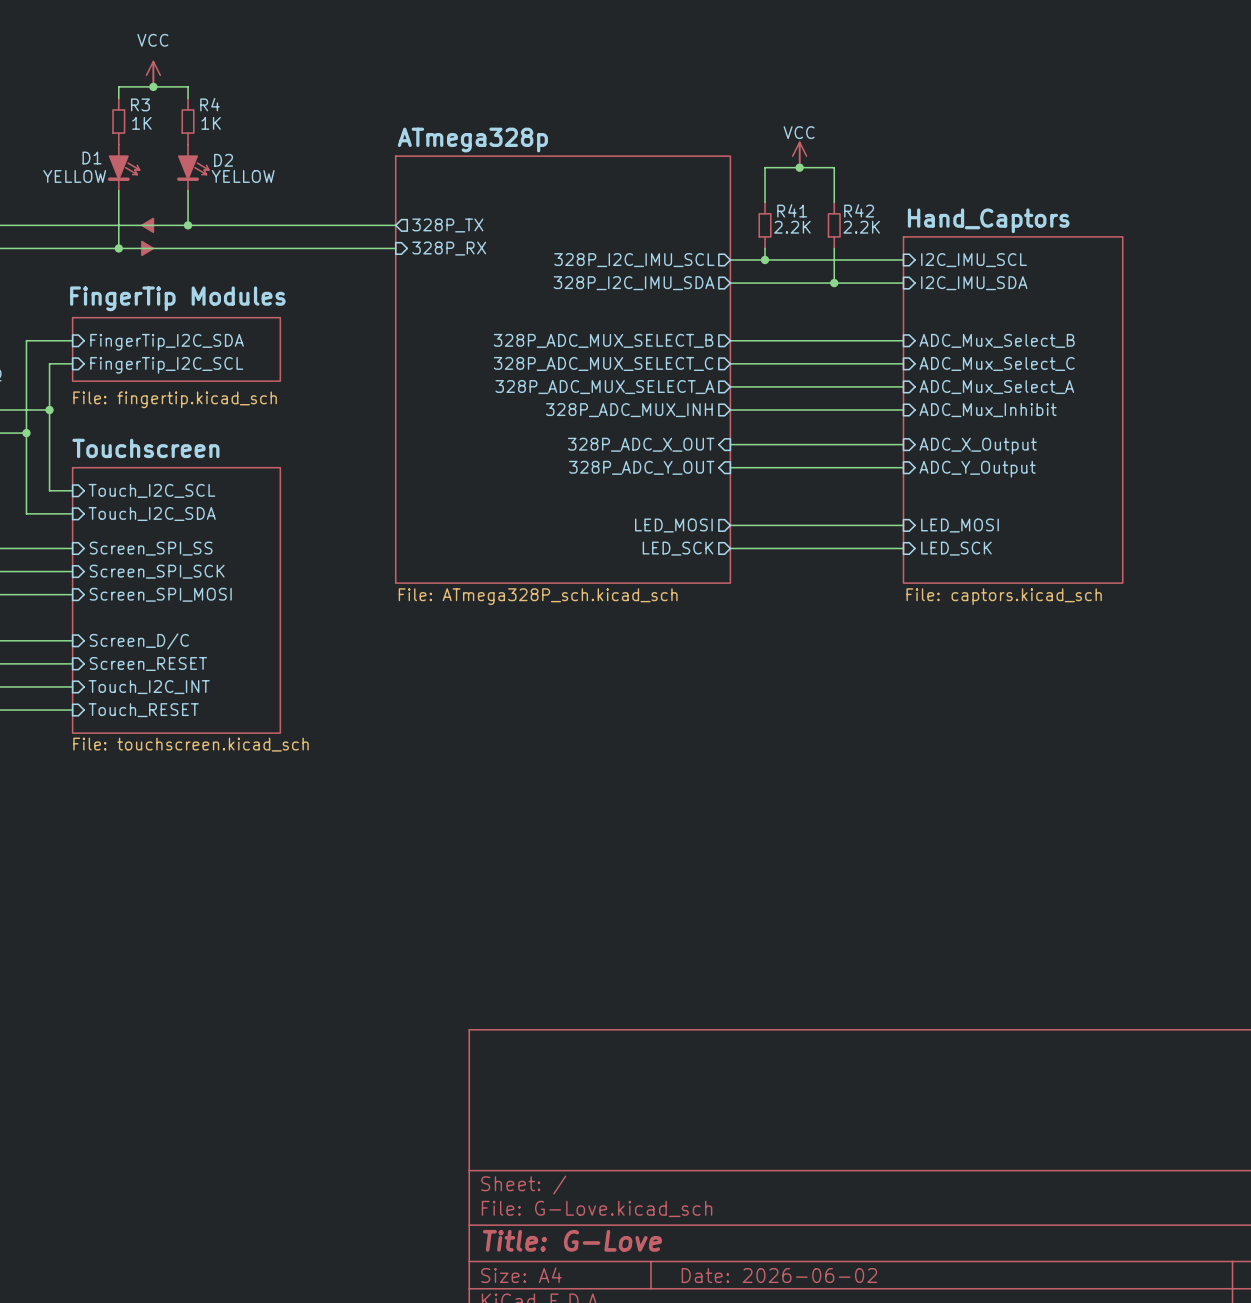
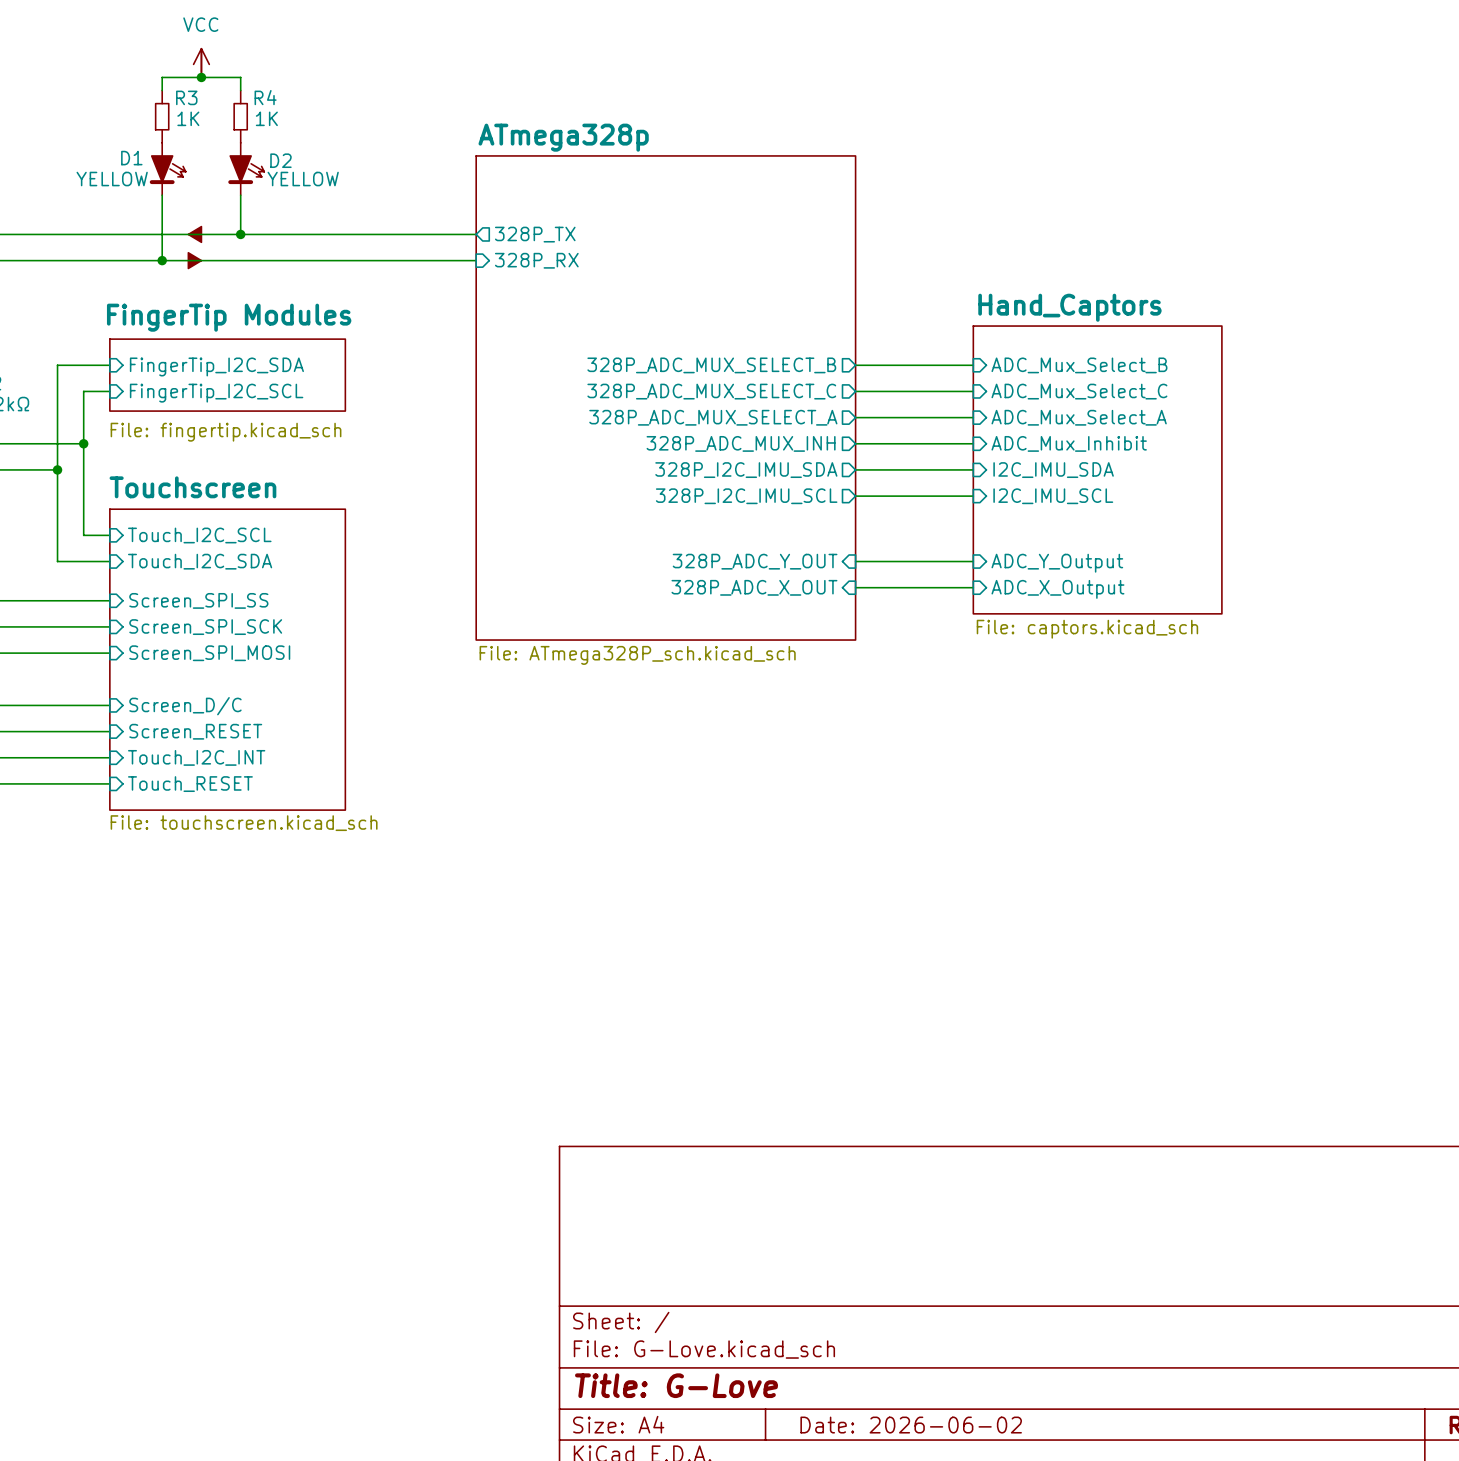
power symbol: VCC (799, 154) -> none
junction: (799, 167) -> none
wire: (765, 202) (765, 167) (834, 167) (834, 202) -> none
R41: 2.2K (765, 225) -> none
R42: 2.2K (834, 225) -> none
wire: (765, 248) (765, 259) -> none
wire: (834, 248) (834, 283) -> none
wire: (730, 259) (903, 259) -> none
junction: (765, 259) -> none
sheet pin position: 328P_I2C_IMU_SCL (634, 260) -> 328P_I2C_IMU_SCL (746, 496)
sheet pin position: I2C_IMU_SCL (974, 260) -> I2C_IMU_SCL (1053, 496)
sheet pin position: 328P_I2C_IMU_SDA (634, 283) -> 328P_I2C_IMU_SDA (746, 470)
wire: (730, 283) (903, 283) -> none
junction: (834, 283) -> none
sheet pin position: I2C_IMU_SDA (974, 283) -> I2C_IMU_SDA (1053, 470)
wire: (834, 340) (903, 340) -> none
sheet pin position: ADC_Mux_Select_B (997, 340) -> ADC_Mux_Select_B (1079, 365)
wire: (834, 363) (903, 363) -> none
sheet pin position: ADC_Mux_Select_C (997, 363) -> ADC_Mux_Select_C (1079, 391)
wire: (834, 386) (903, 386) -> none
sheet pin position: ADC_Mux_Select_A (996, 387) -> ADC_Mux_Select_A (1079, 417)
wire: (834, 410) (903, 410) -> none
sheet pin position: ADC_Mux_Inhibit (988, 410) -> ADC_Mux_Inhibit (1069, 443)
sheet Hand_Captors: File: captors.kicad_sch (1013, 410) -> none
wire: none -> (855, 469) (973, 469)
sheet Hand_Captors: none -> File: captors.kicad_sch (1097, 469)
sheet pin position: 328P_ADC_X_OUT (641, 444) -> 328P_ADC_X_OUT (754, 587)
wire: (730, 444) (903, 444) -> none
sheet pin position: ADC_X_Output (978, 446) -> ADC_X_Output (1057, 589)
wire: none -> (855, 496) (973, 496)
sheet pin position: 328P_ADC_Y_OUT (641, 467) -> 328P_ADC_Y_OUT (755, 561)
wire: (730, 467) (903, 467) -> none
sheet pin position: ADC_Y_Output (977, 469) -> ADC_Y_Output (1057, 563)
wire: none -> (855, 561) (973, 561)
sheet pin: LED_MOSI (673, 525) -> none
wire: (730, 525) (903, 525) -> none
sheet pin: LED_MOSI (960, 525) -> none
wire: none -> (855, 587) (973, 587)
sheet pin: LED_SCK (678, 548) -> none
wire: (730, 548) (903, 548) -> none
sheet pin: LED_SCK (956, 548) -> none

